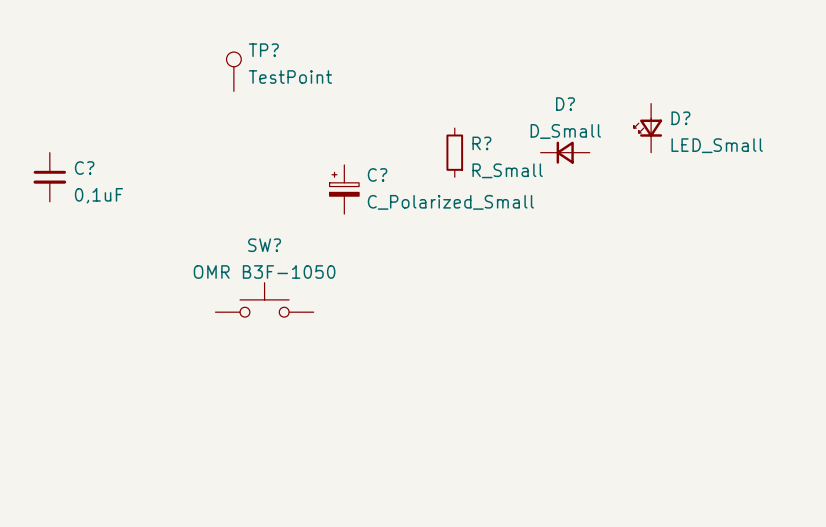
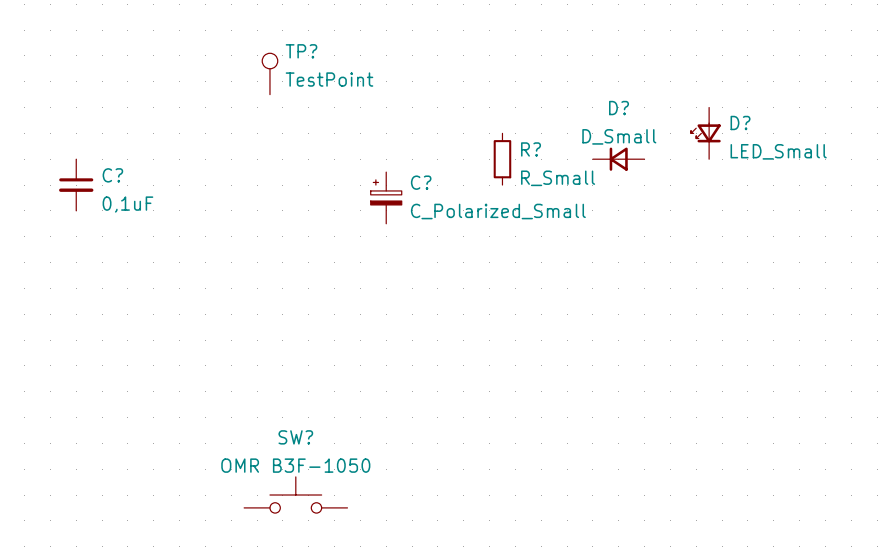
SW? position: (264, 299) -> (295, 495)

